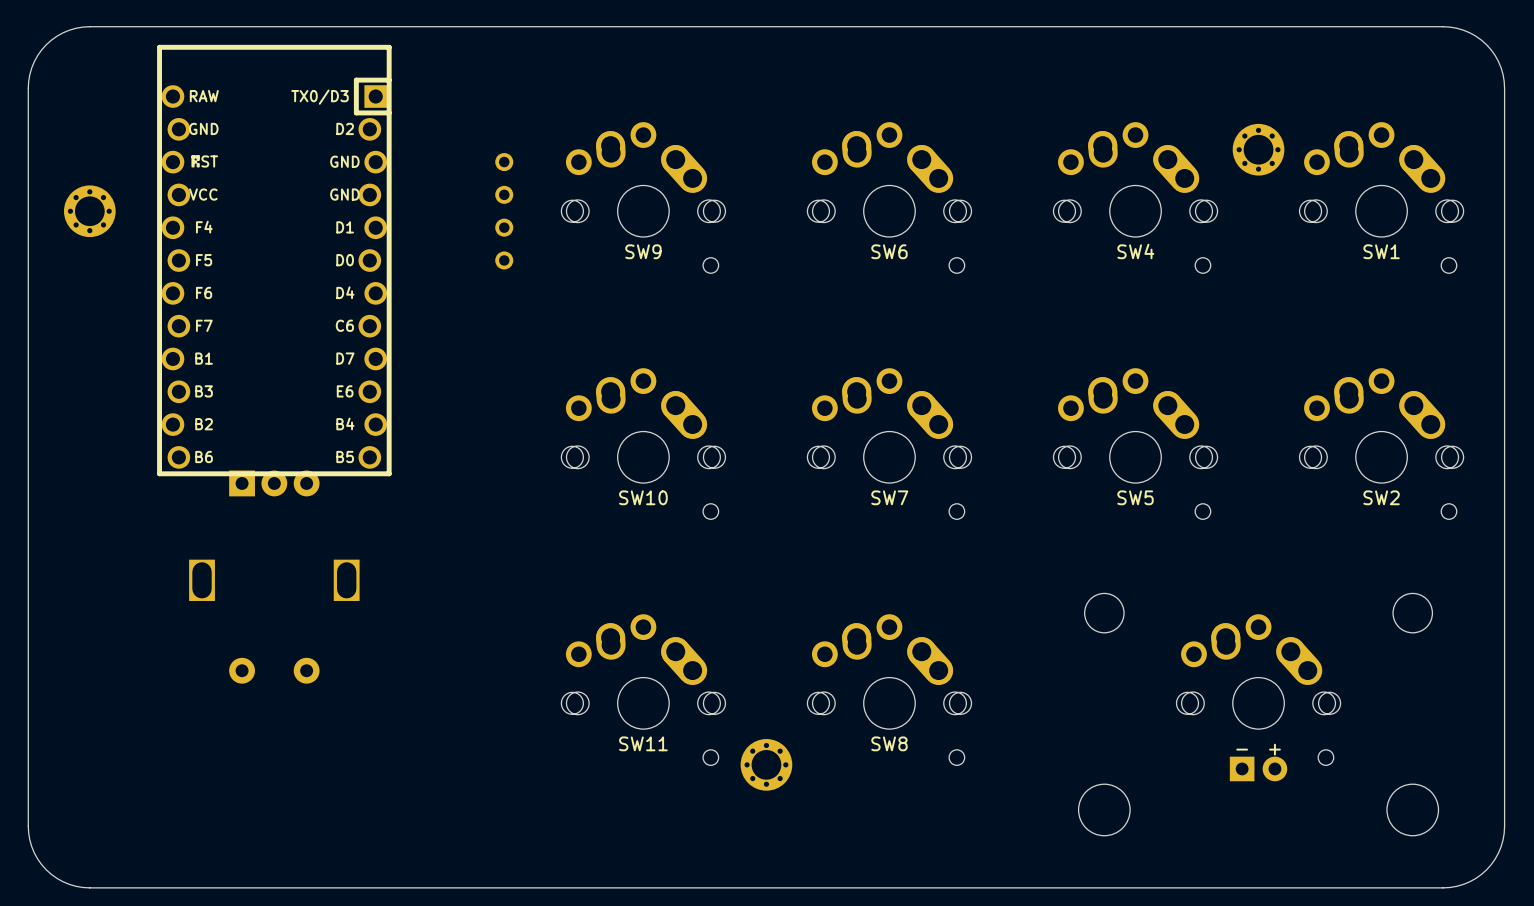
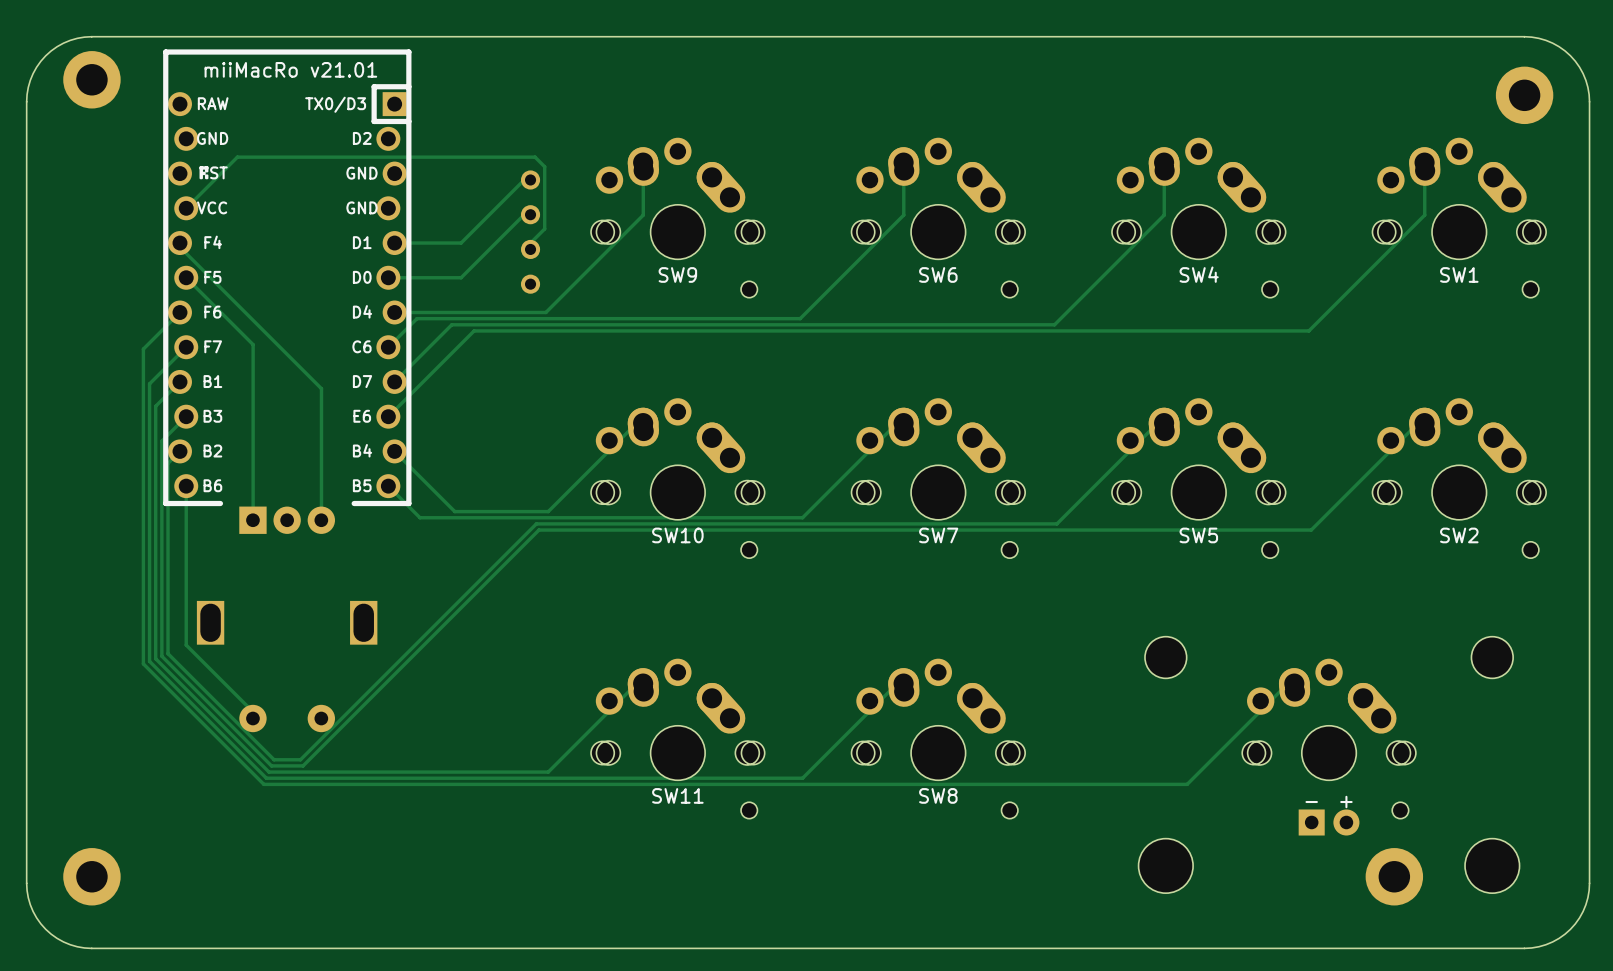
part footprint: [157, 44, 392, 477] -> [163, 49, 412, 507]
text: none -> miiMacRo v21.01 (290, 69)
part: none -> (91, 79)
part: none -> (1524, 95)
track: none -> (643, 156) (643, 215) (545, 312) (394, 312)
track: none -> (903, 156) (903, 215) (800, 318) (416, 318) (388, 347)
track: none -> (1164, 156) (1164, 215) (1054, 324) (451, 324) (394, 381)
track: none -> (1424, 156) (1424, 215) (1308, 330) (474, 330) (388, 416)
part: (1258, 149) -> none
track: none -> (530, 173) (461, 243) (394, 243)
track: none -> (186, 208) (237, 157) (535, 157) (544, 166) (544, 228) (530, 242)
track: none -> (530, 208) (461, 277) (388, 277)
part: (89, 211) -> none
track: none -> (179, 243) (179, 247) (321, 388) (321, 513)
track: none -> (186, 277) (253, 344) (253, 513)
track: none -> (179, 312) (143, 349) (143, 663) (263, 784) (1187, 784) (1294, 677)
track: none -> (186, 347) (149, 383) (149, 661) (266, 778) (802, 778) (903, 677)
track: none -> (179, 381) (155, 406) (155, 658) (268, 772) (548, 772) (643, 677)
track: none -> (643, 416) (548, 511) (454, 511) (394, 451)
track: none -> (903, 416) (802, 517) (419, 517) (388, 486)
track: none -> (1164, 416) (1056, 523) (536, 523) (300, 759) (274, 759) (168, 653) (168, 463) (179, 451)
track: none -> (1424, 416) (1311, 530) (538, 530) (303, 765) (271, 765) (161, 656) (161, 441) (186, 416)
track: none -> (186, 486) (186, 645) (253, 712)
part: (766, 764) -> none
part: none -> (91, 876)
part: none -> (1394, 876)

